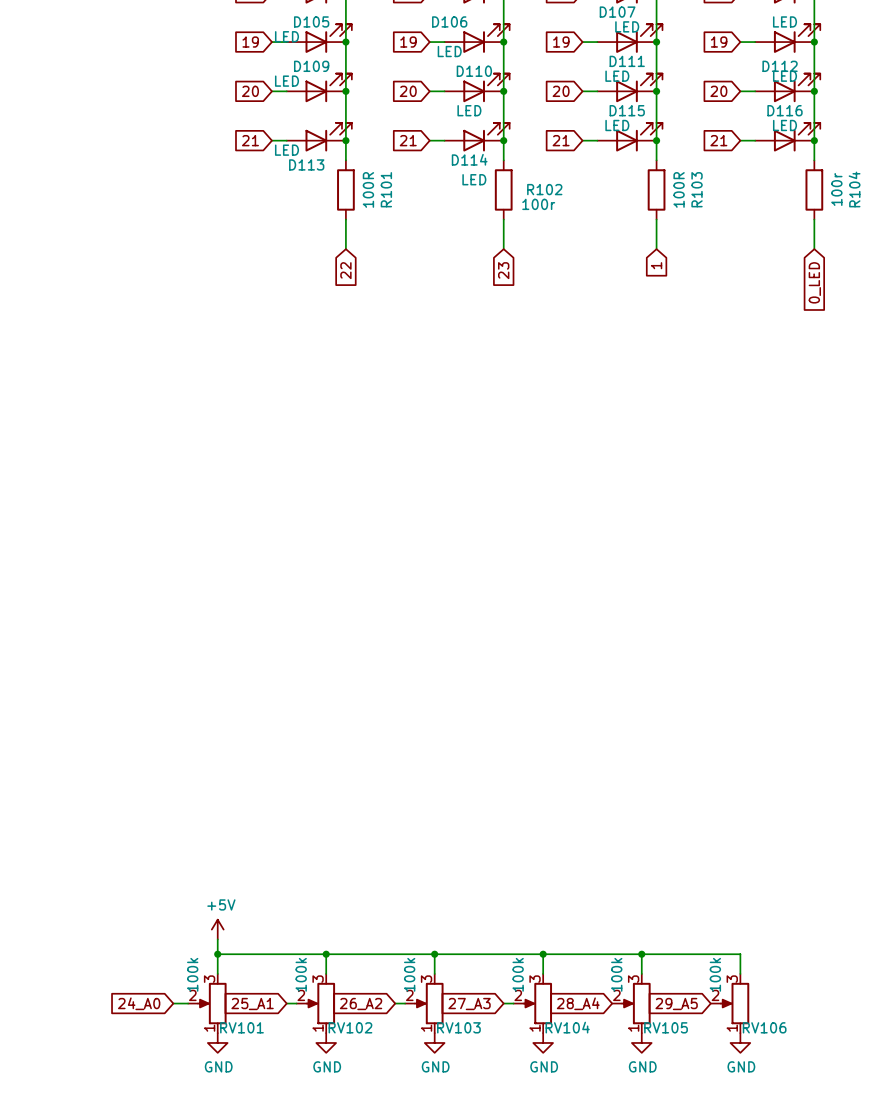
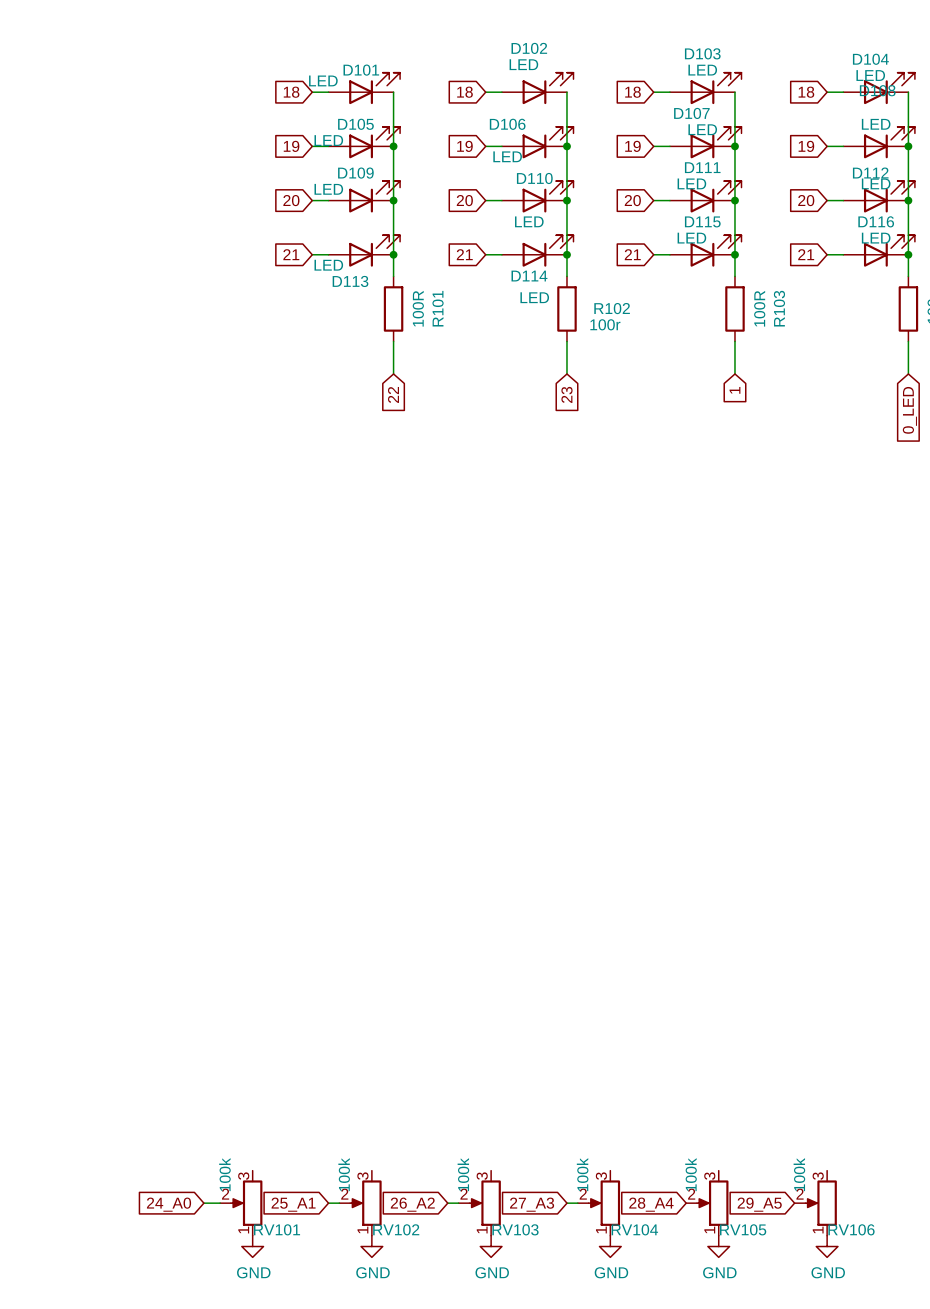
power symbol: +5V (217, 929) -> none
wire: (217, 939) (217, 973) -> none
wire: (217, 954) (740, 954) (740, 973) -> none
junction: (217, 954) -> none
wire: (326, 954) (326, 973) -> none
junction: (326, 954) -> none
wire: (434, 954) (434, 973) -> none
junction: (434, 954) -> none
wire: (543, 954) (543, 973) -> none
junction: (543, 954) -> none
wire: (641, 954) (641, 973) -> none
junction: (641, 954) -> none

